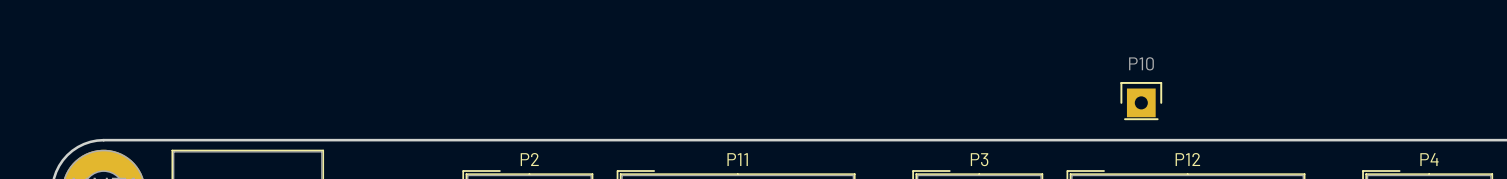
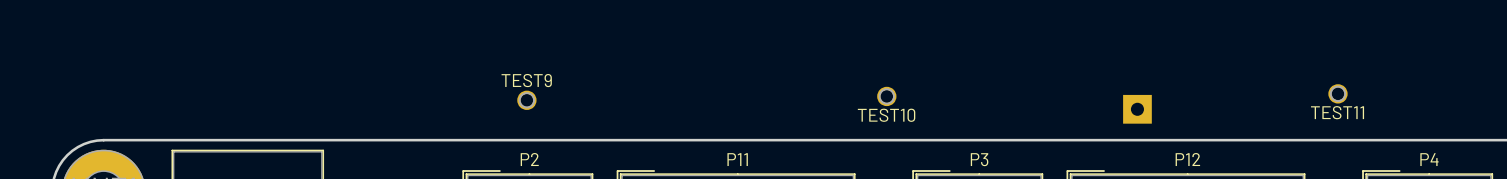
TEST11: none -> (1337, 93)
TEST10: none -> (886, 96)
TEST9: none -> (526, 100)
P10 side: top (1141, 101) -> bottom (1137, 109)

